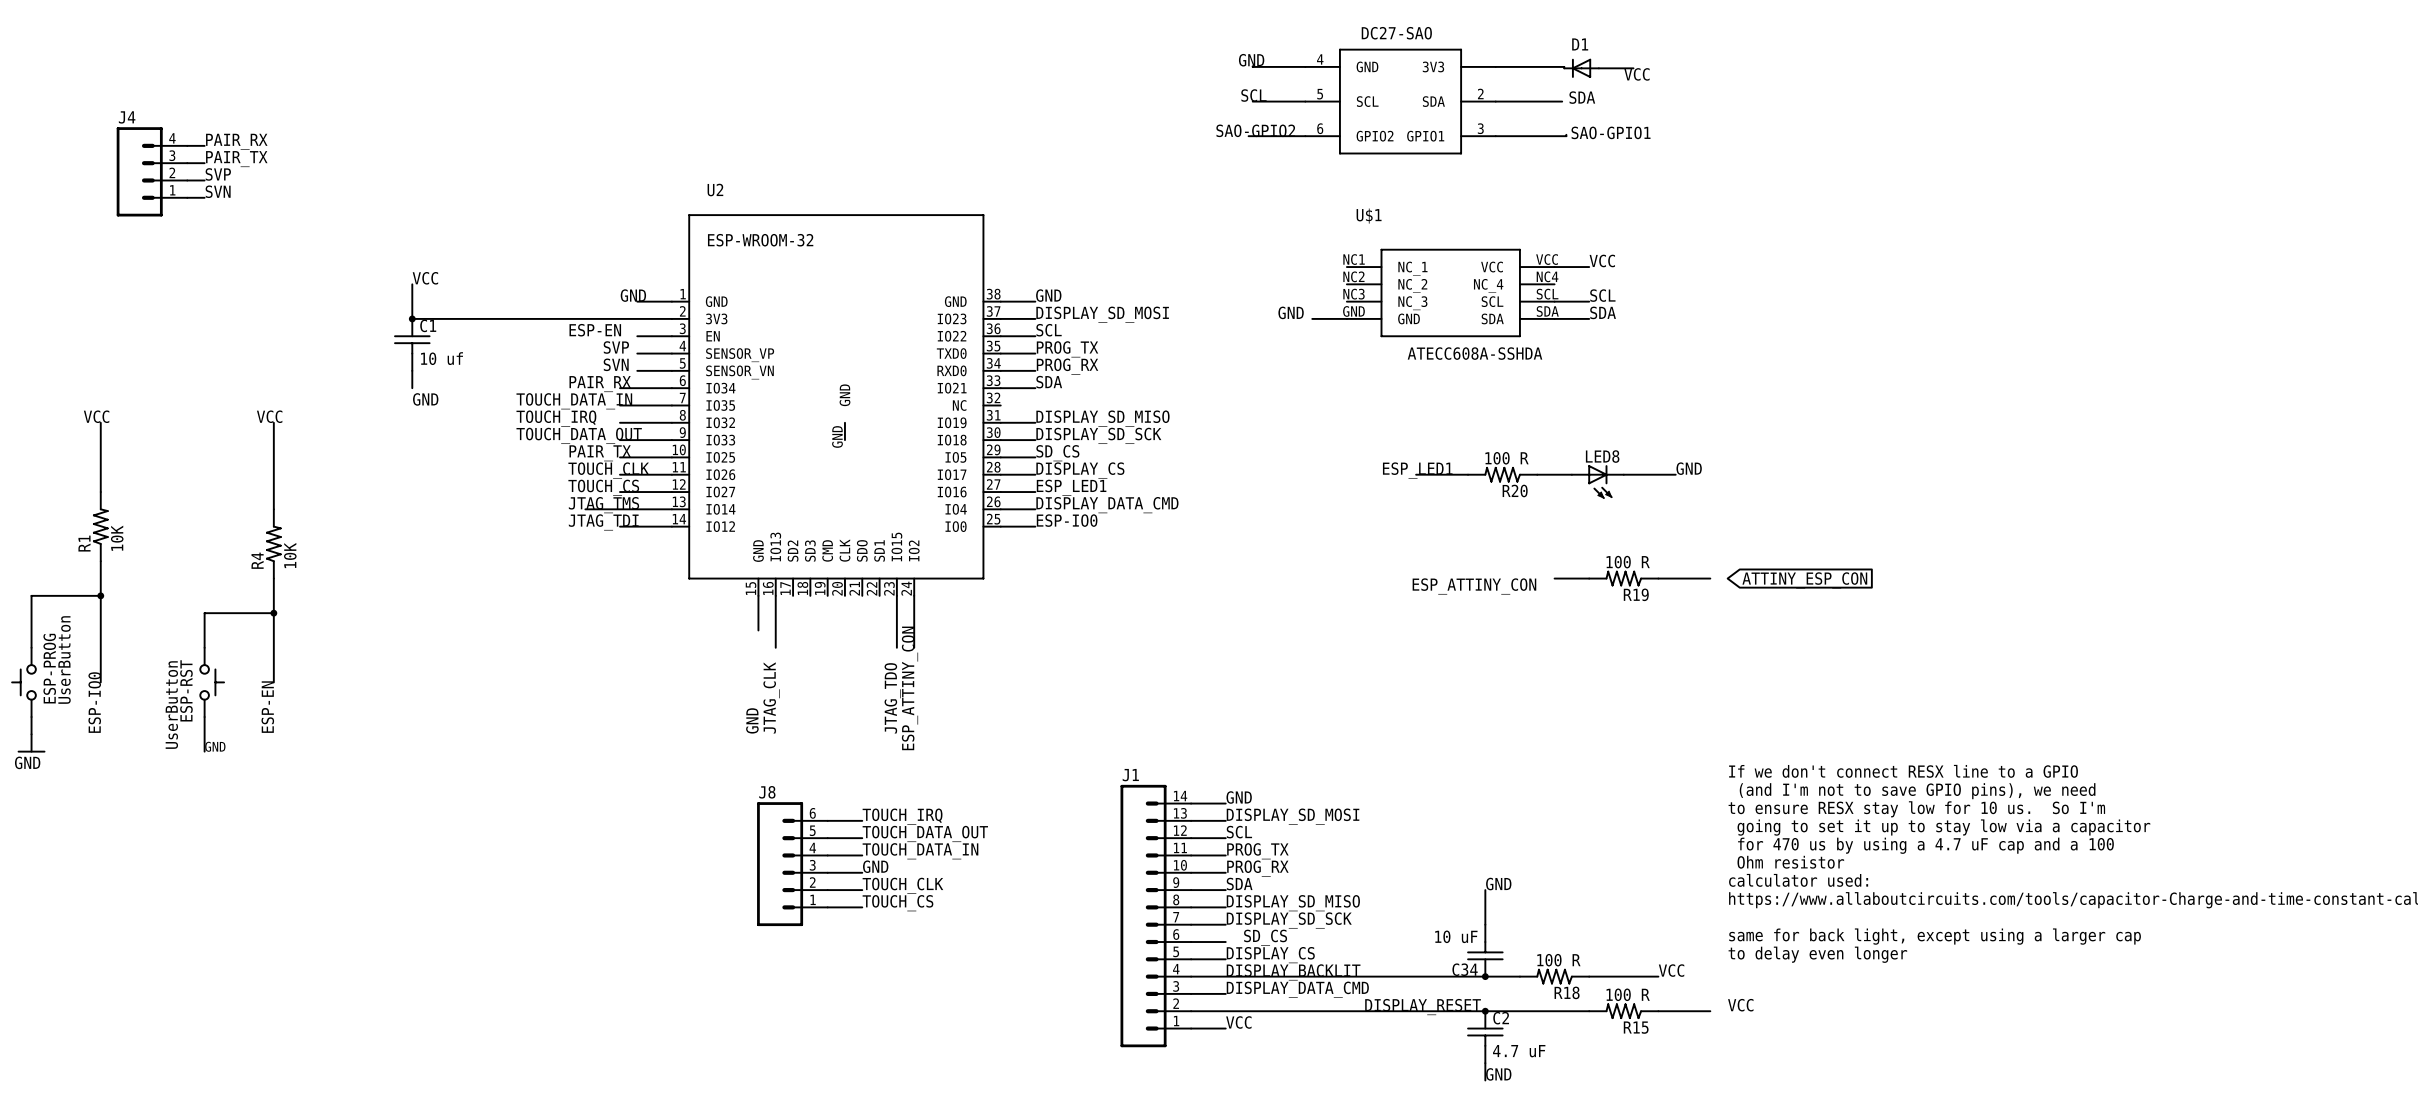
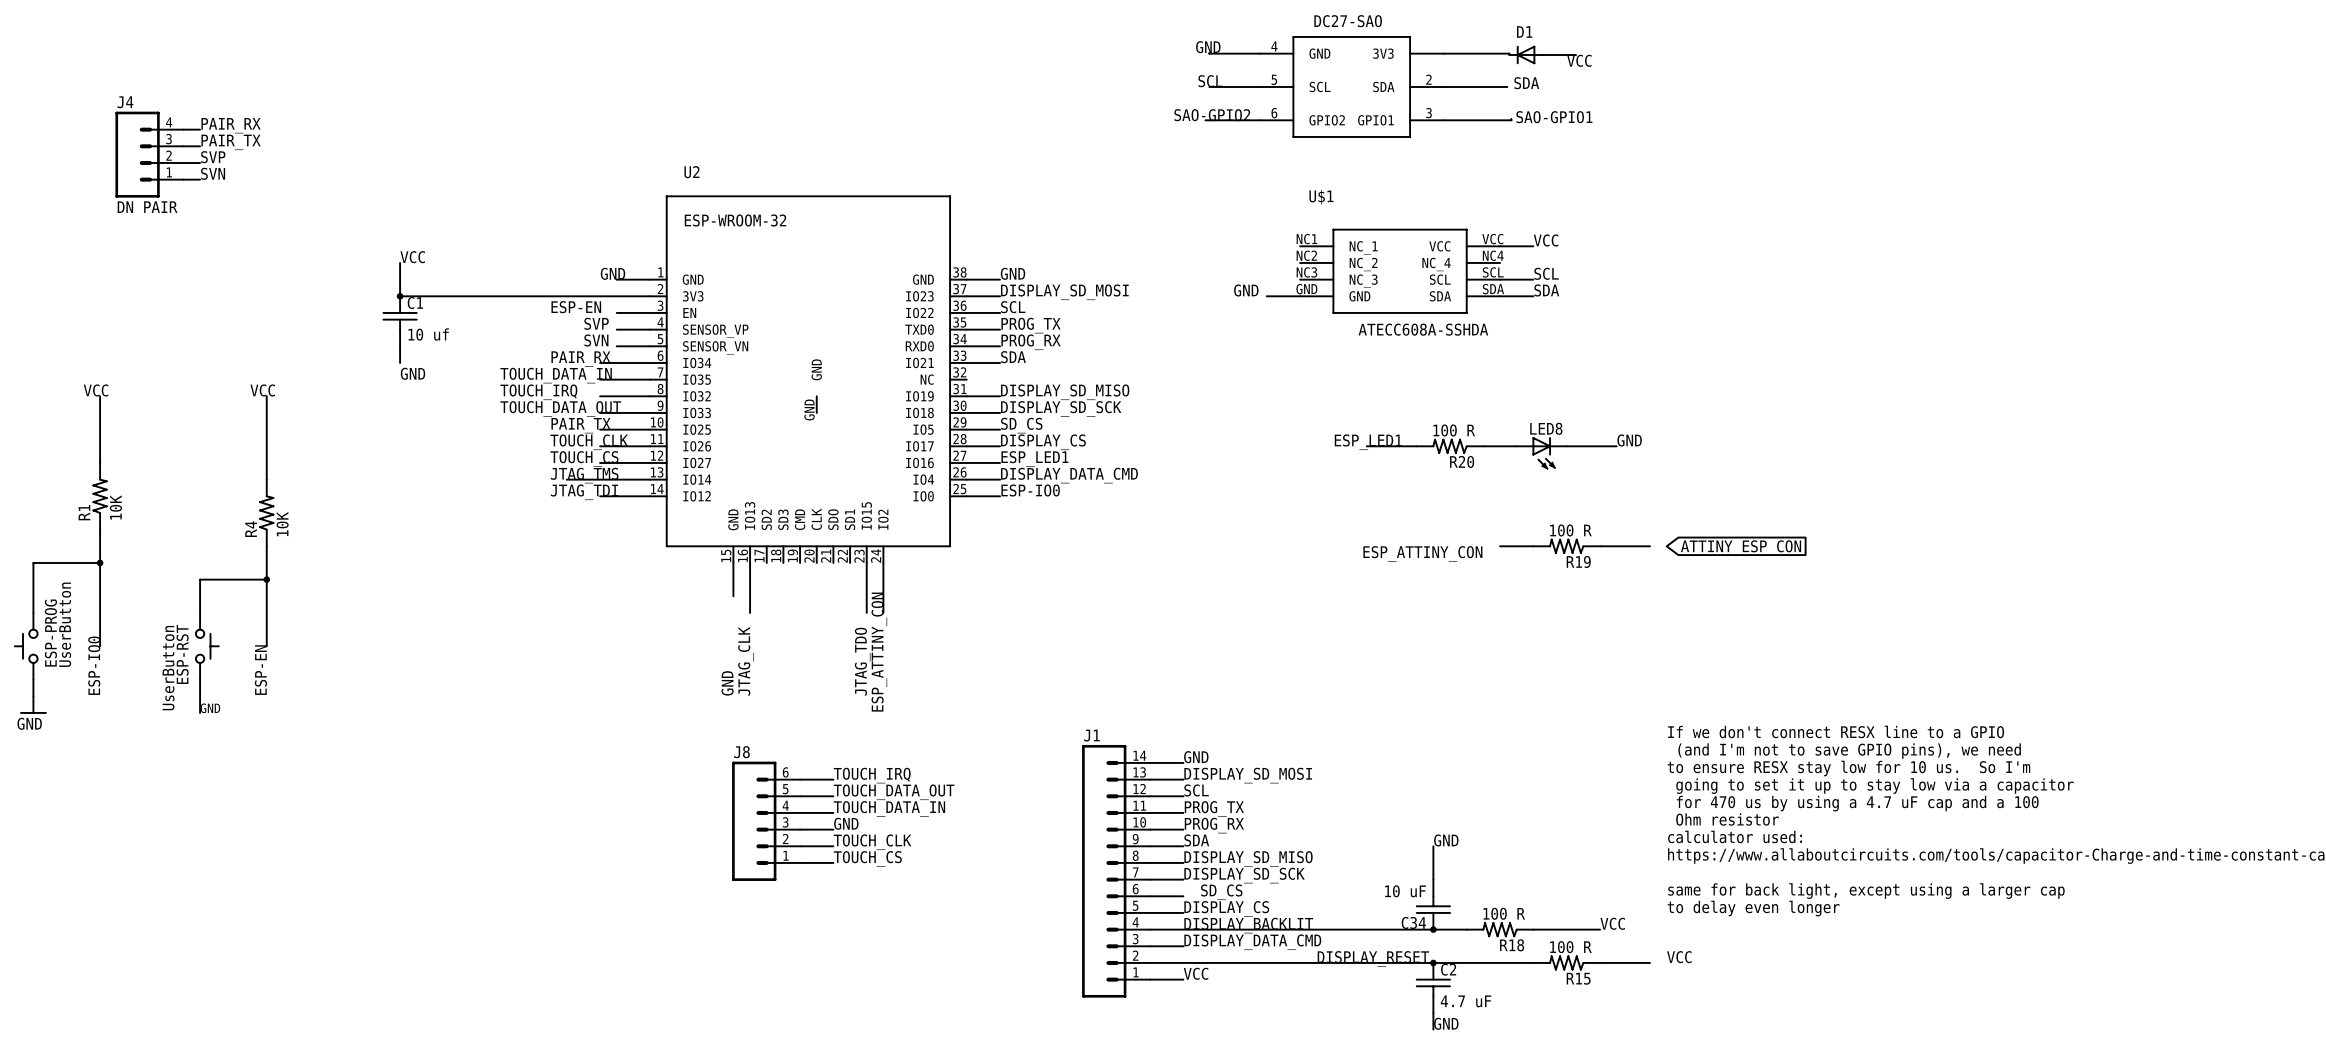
J4 value: none -> DN PAIR (147, 207)

